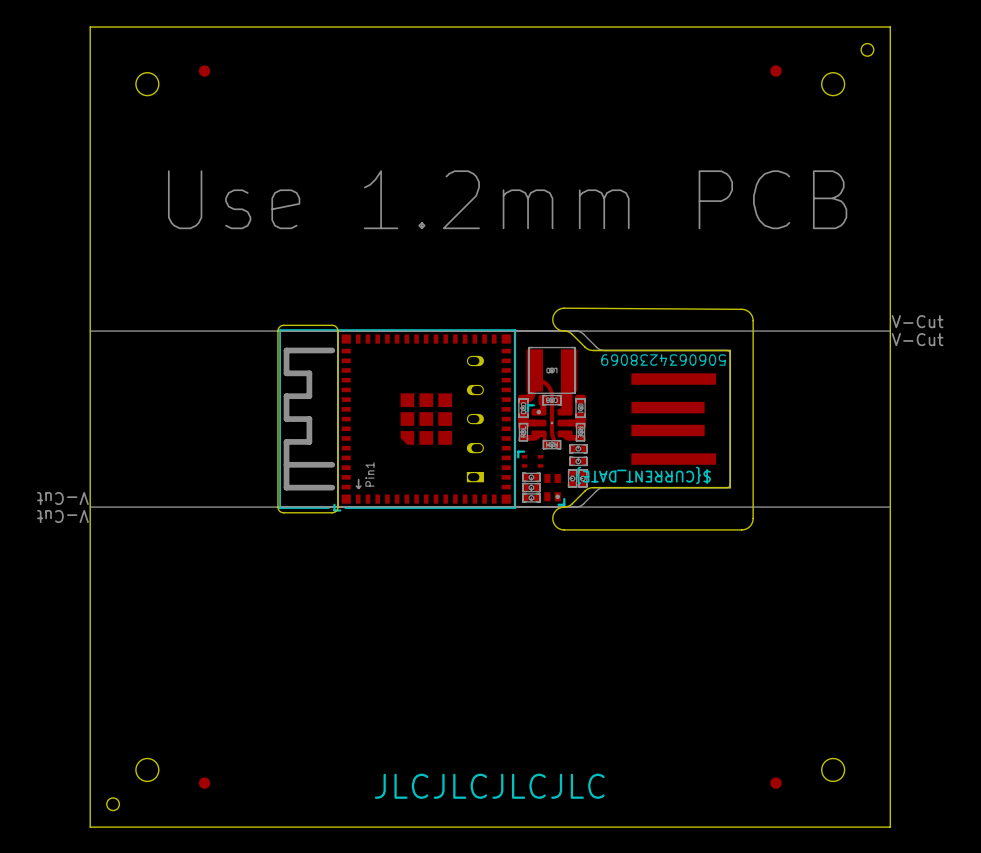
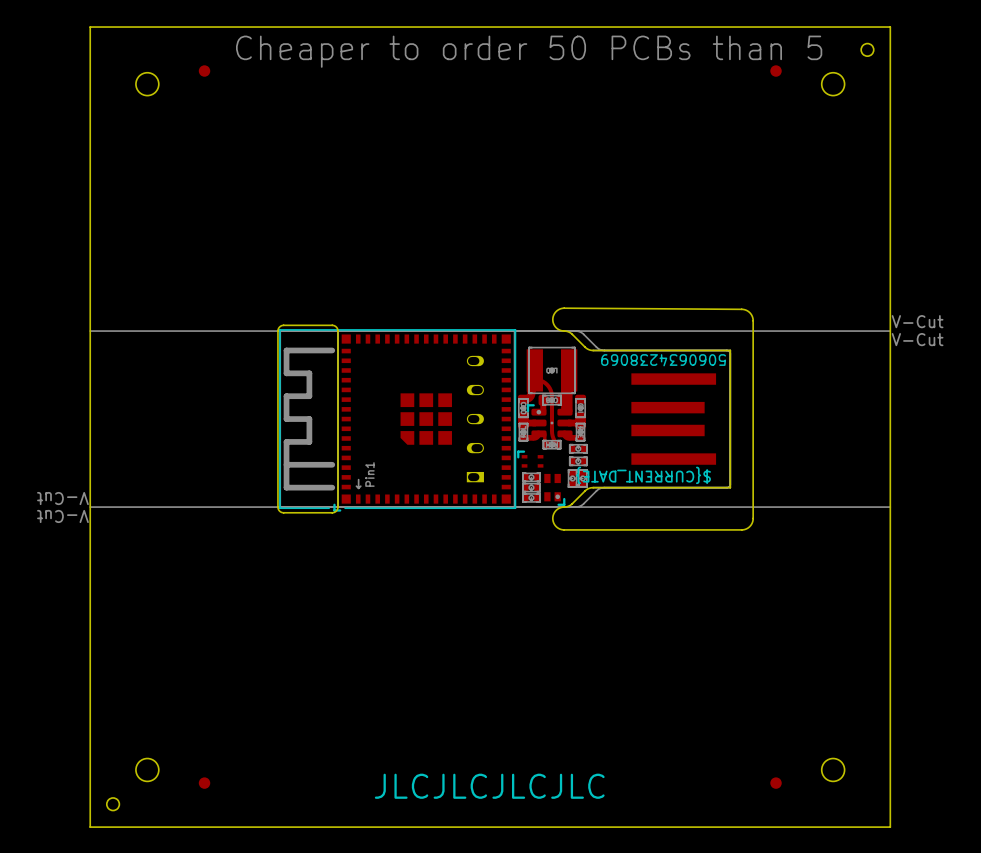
text: none -> Cheaper to order 50 PCBs than 5 (529, 51)
text: Use 1.2mm PCB (507, 199) -> none

